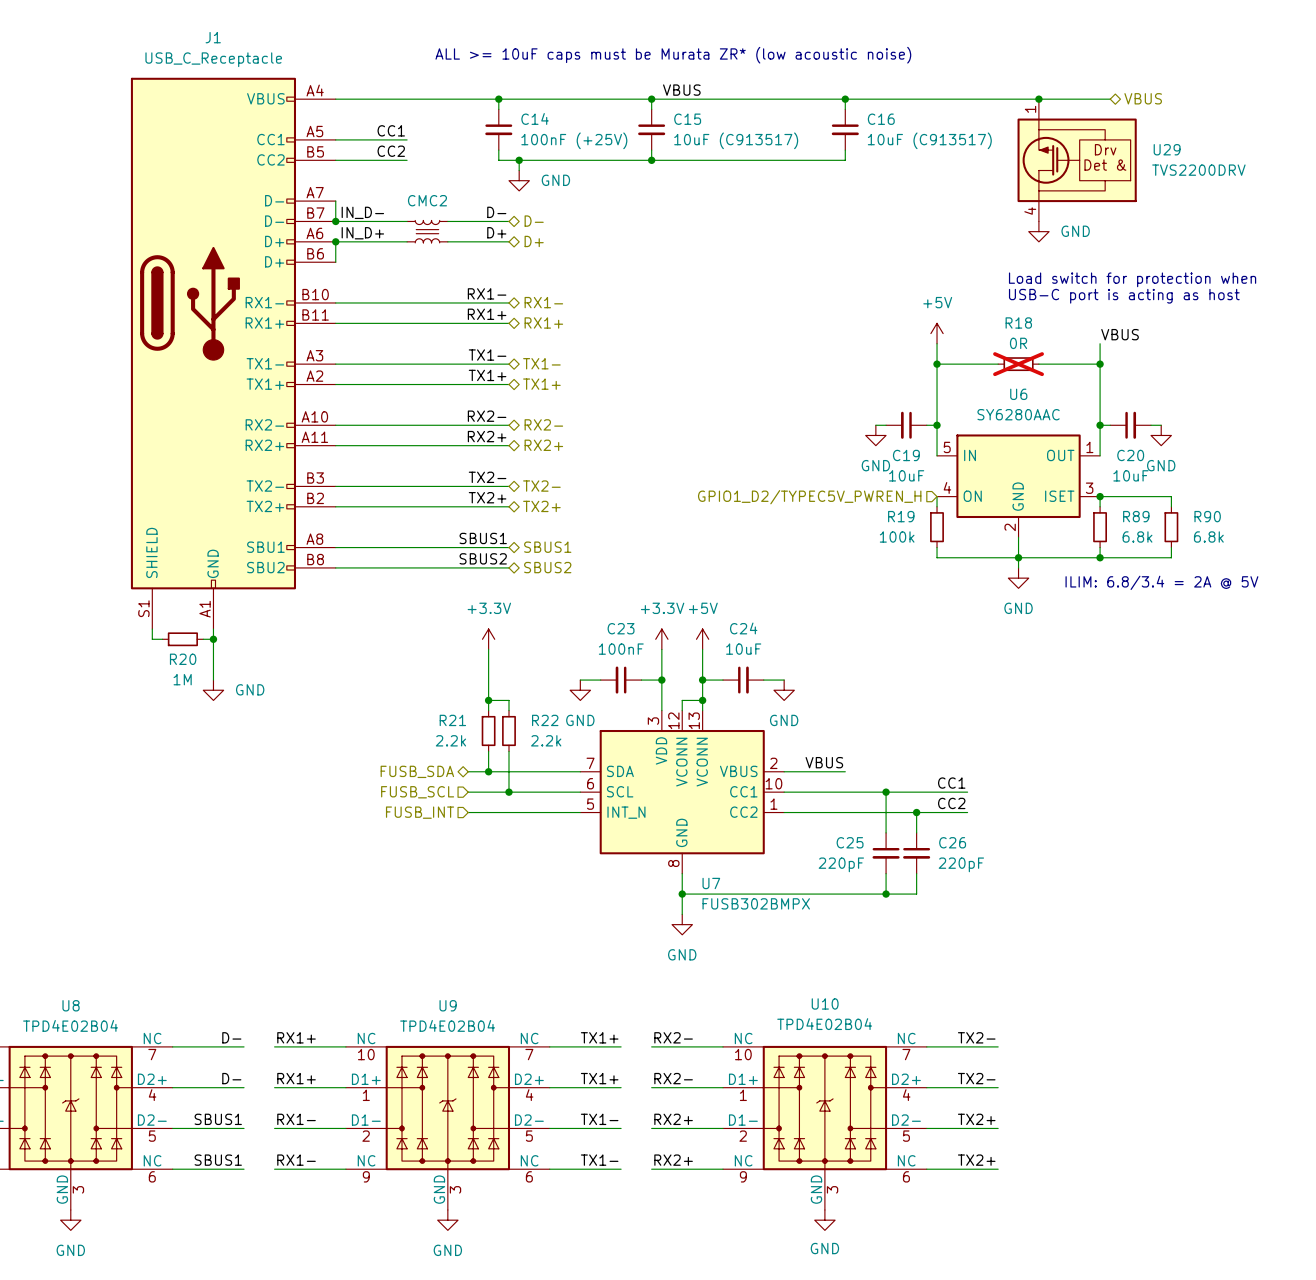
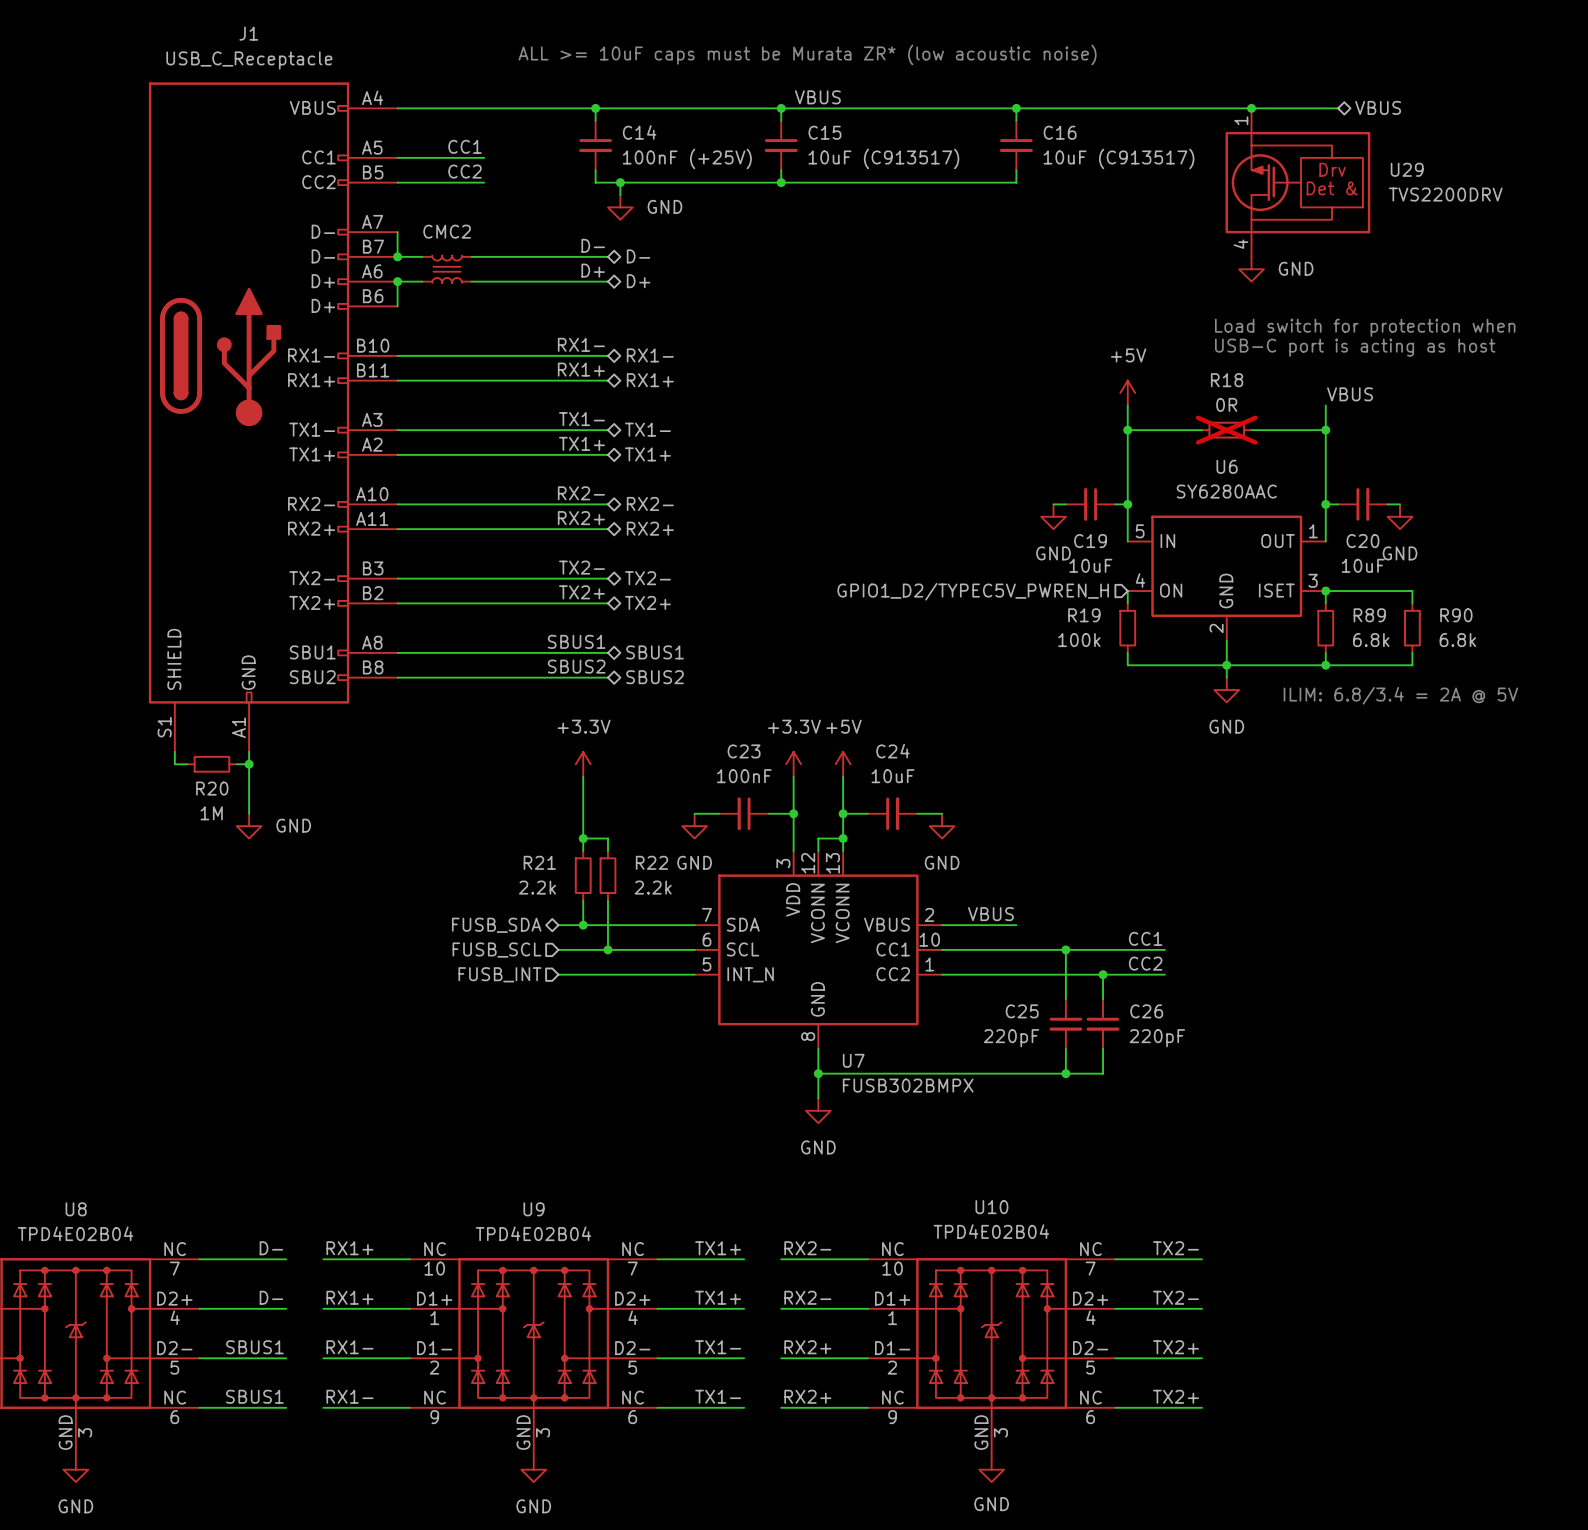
label: IN_D- (362, 212) -> none
CMC2 position: (427, 231) -> (447, 269)
label: IN_D+ (362, 233) -> none

